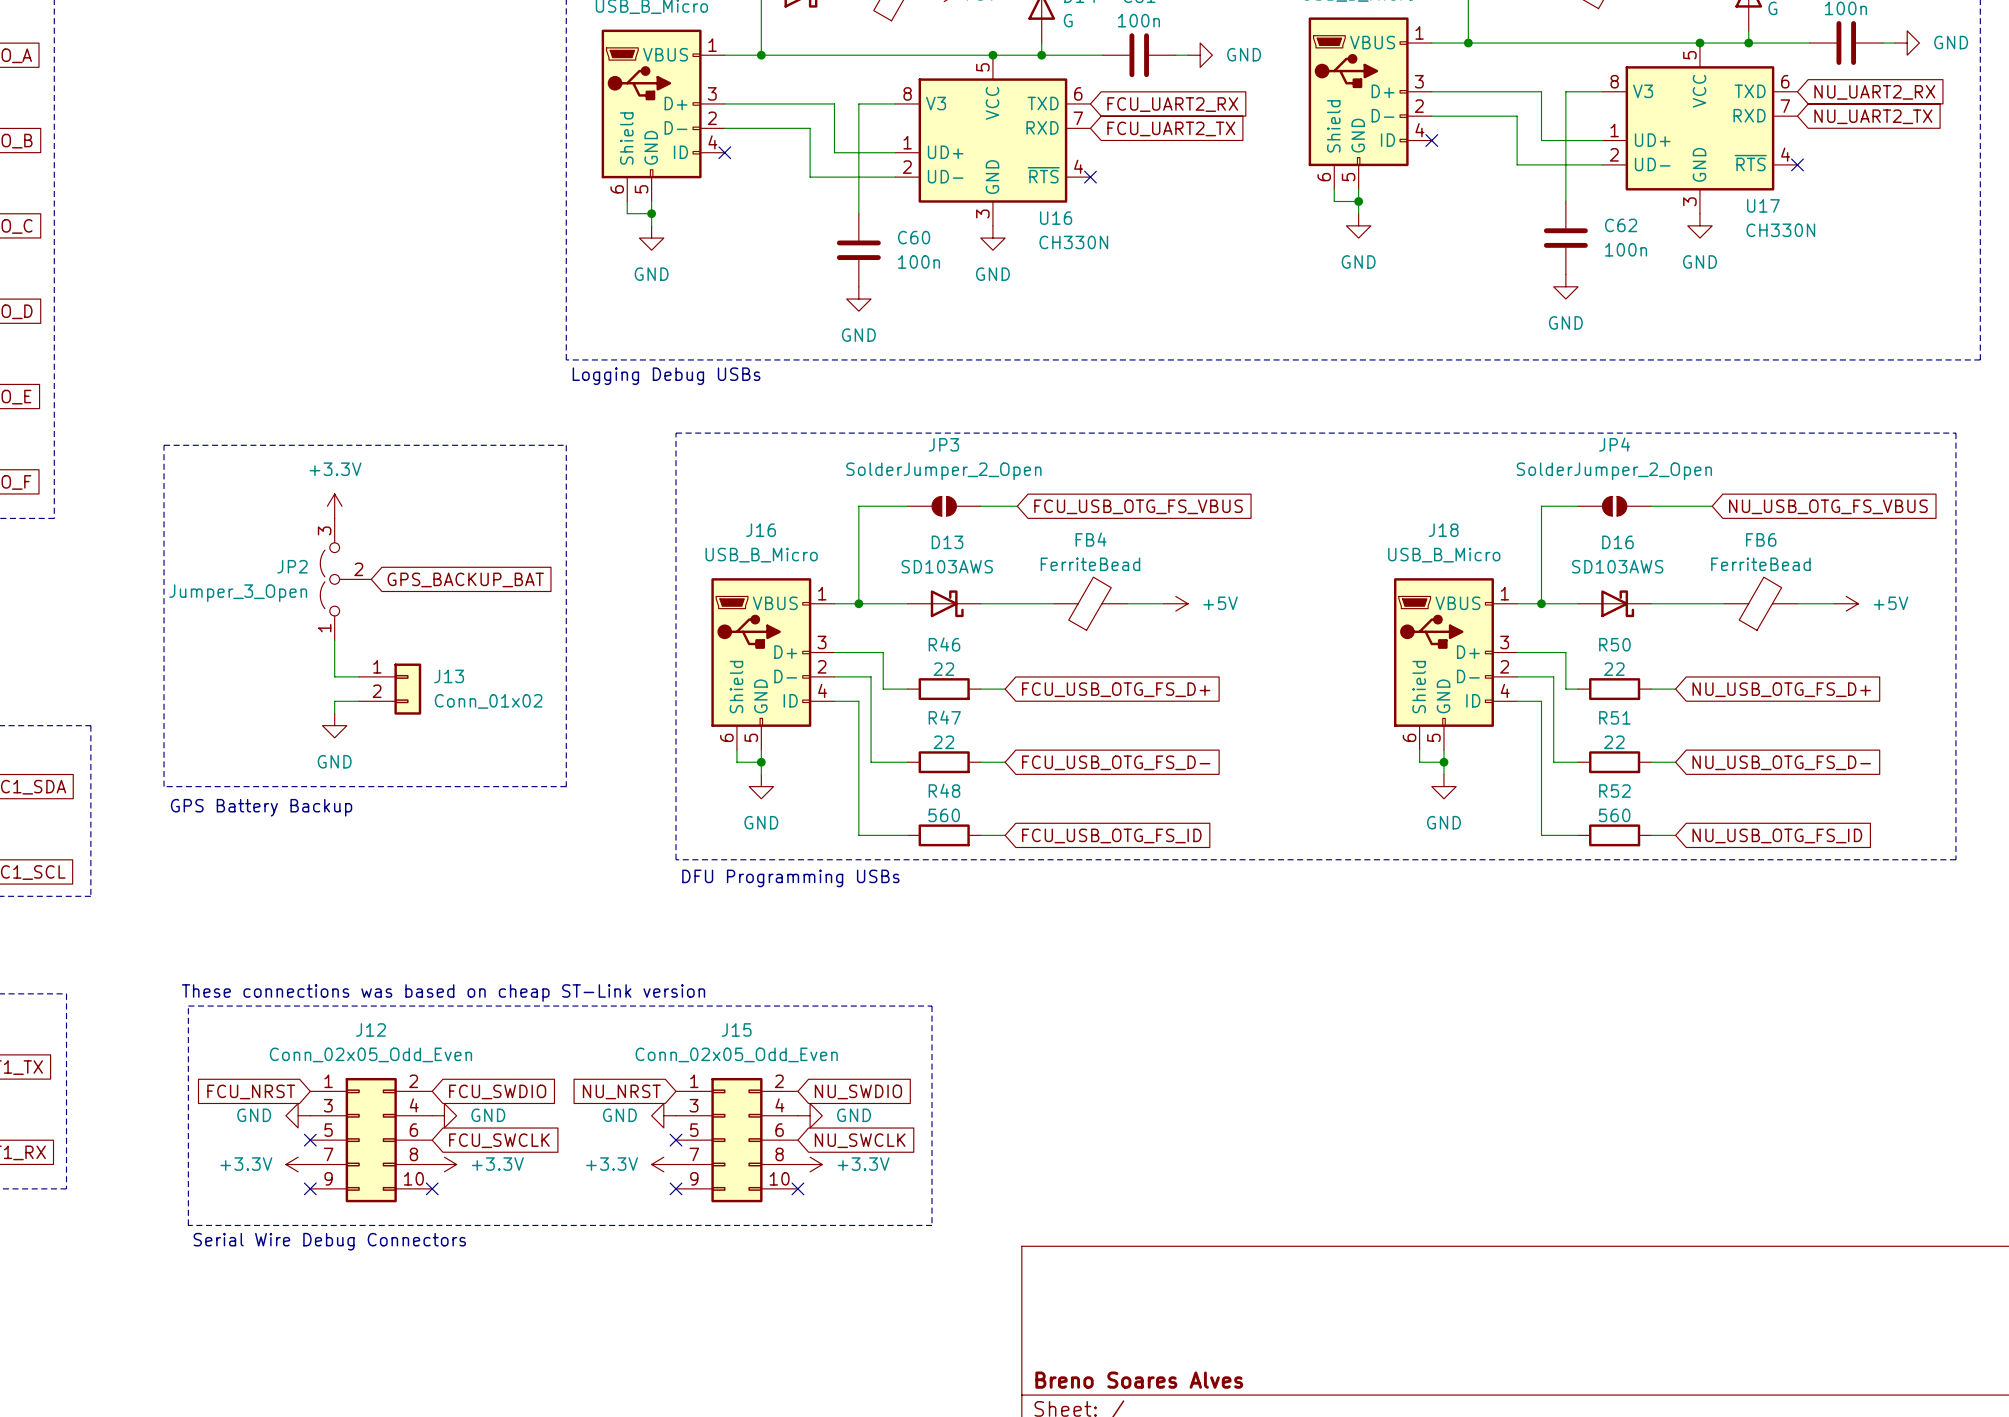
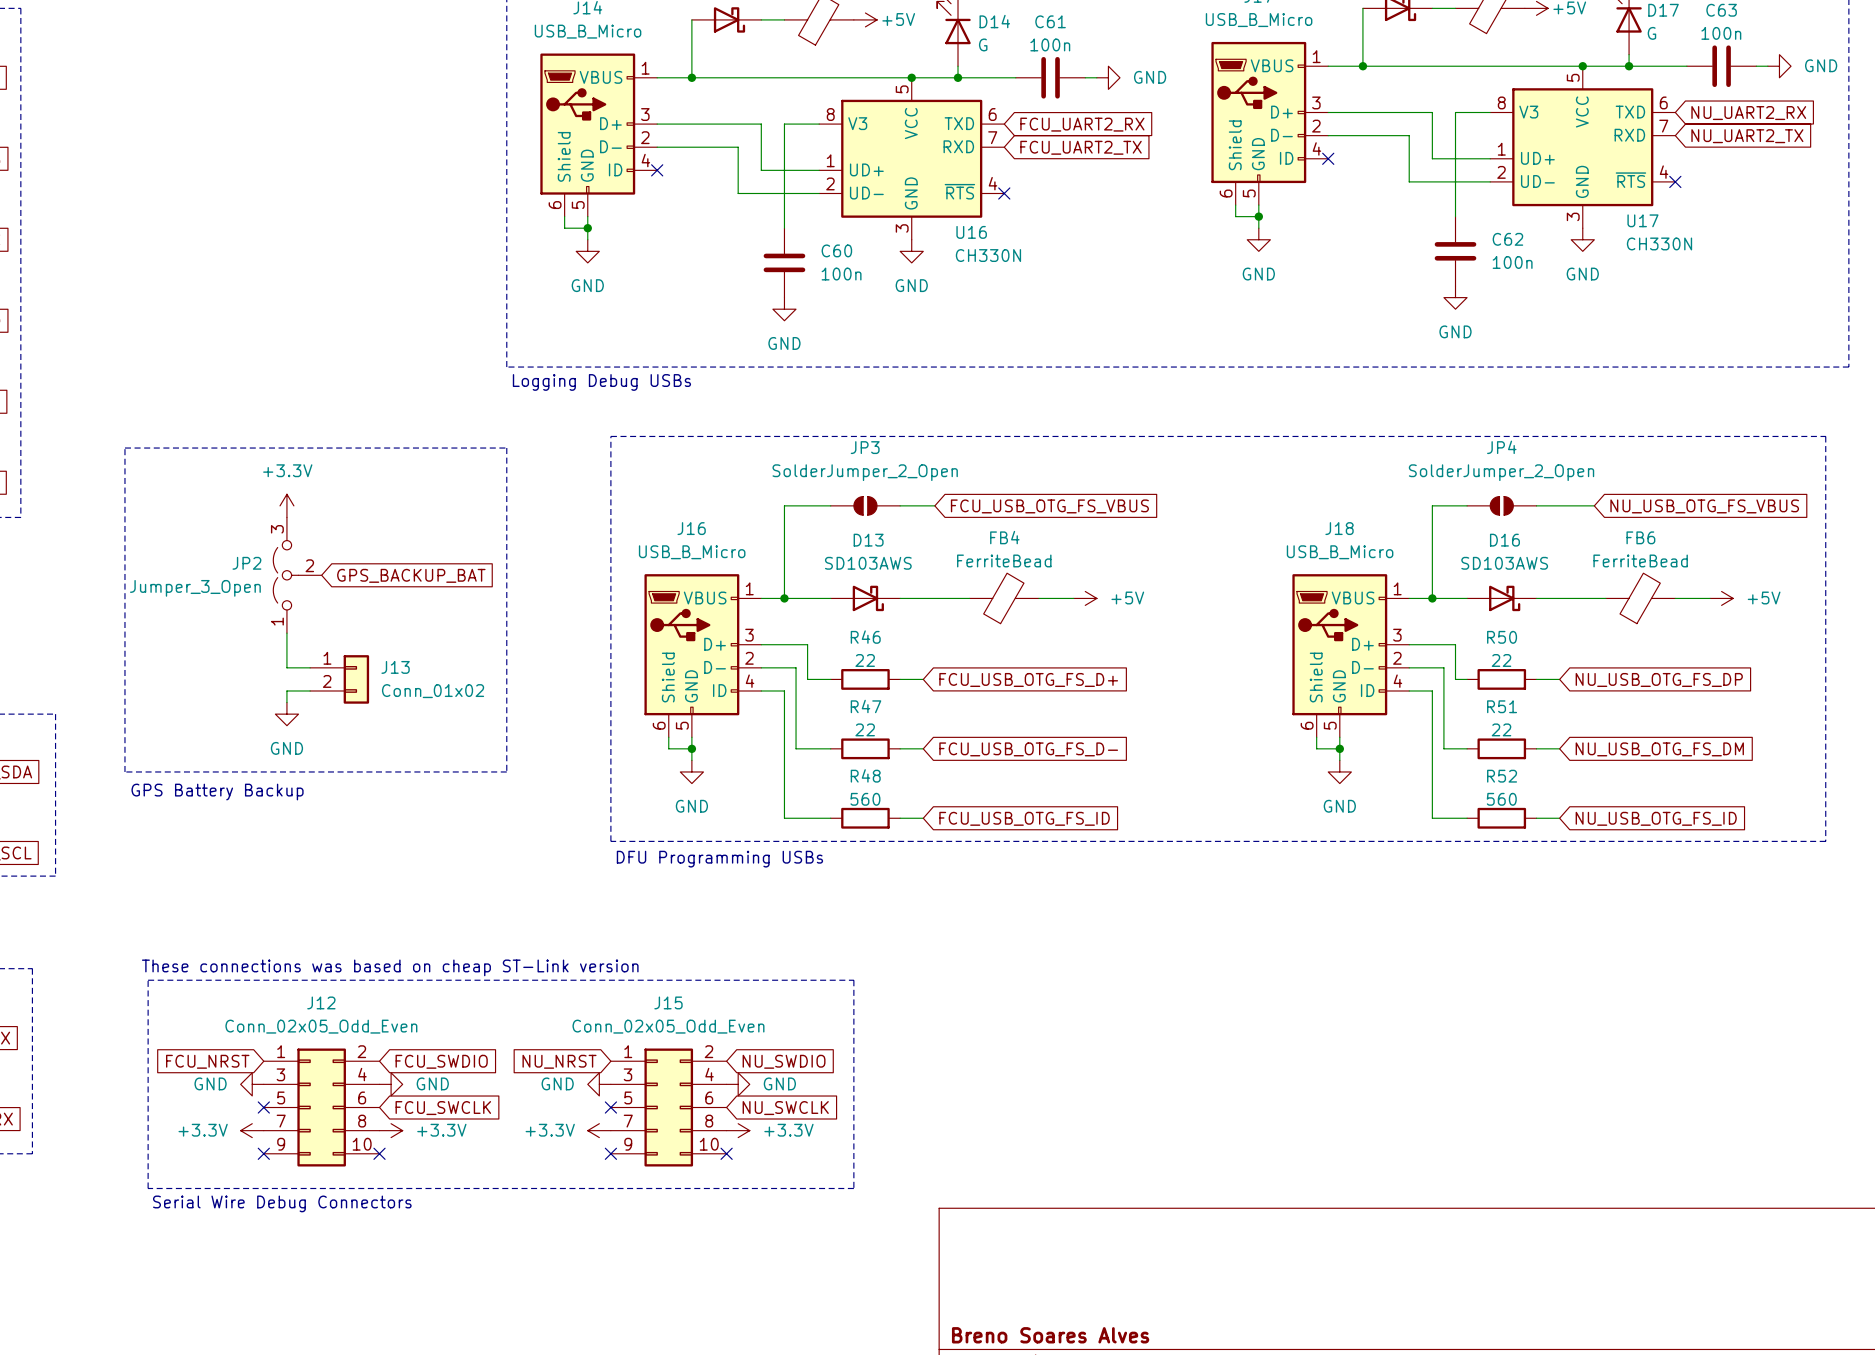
global label: NU_USB_OTG_FS_D+ (1781, 689) -> NU_USB_OTG_FS_DP (1659, 679)
global label: NU_USB_OTG_FS_D- (1781, 762) -> NU_USB_OTG_FS_DM (1659, 749)

